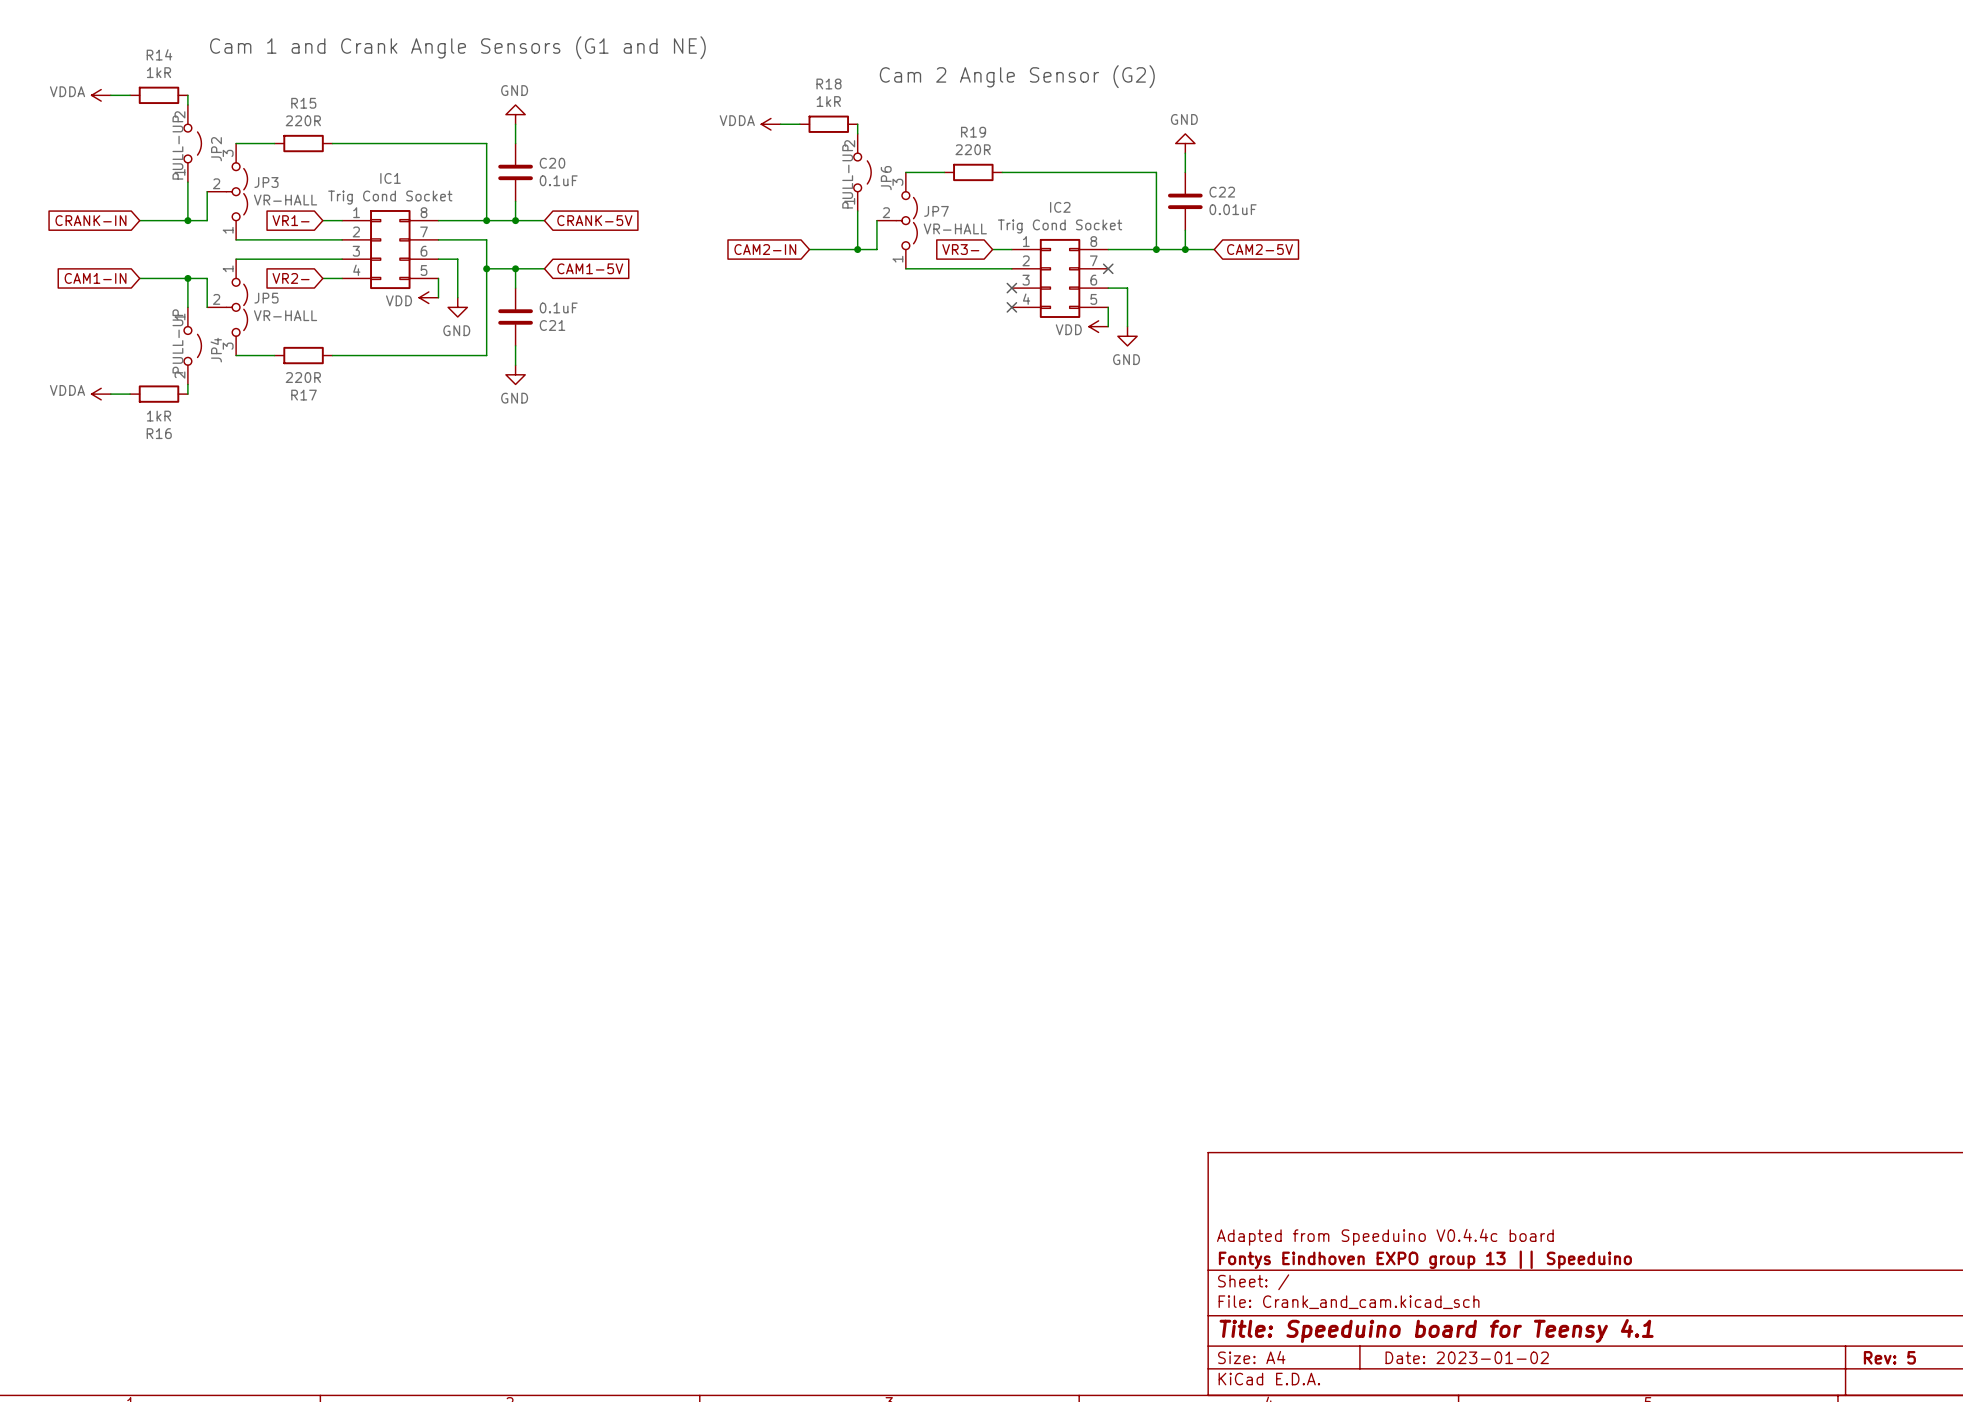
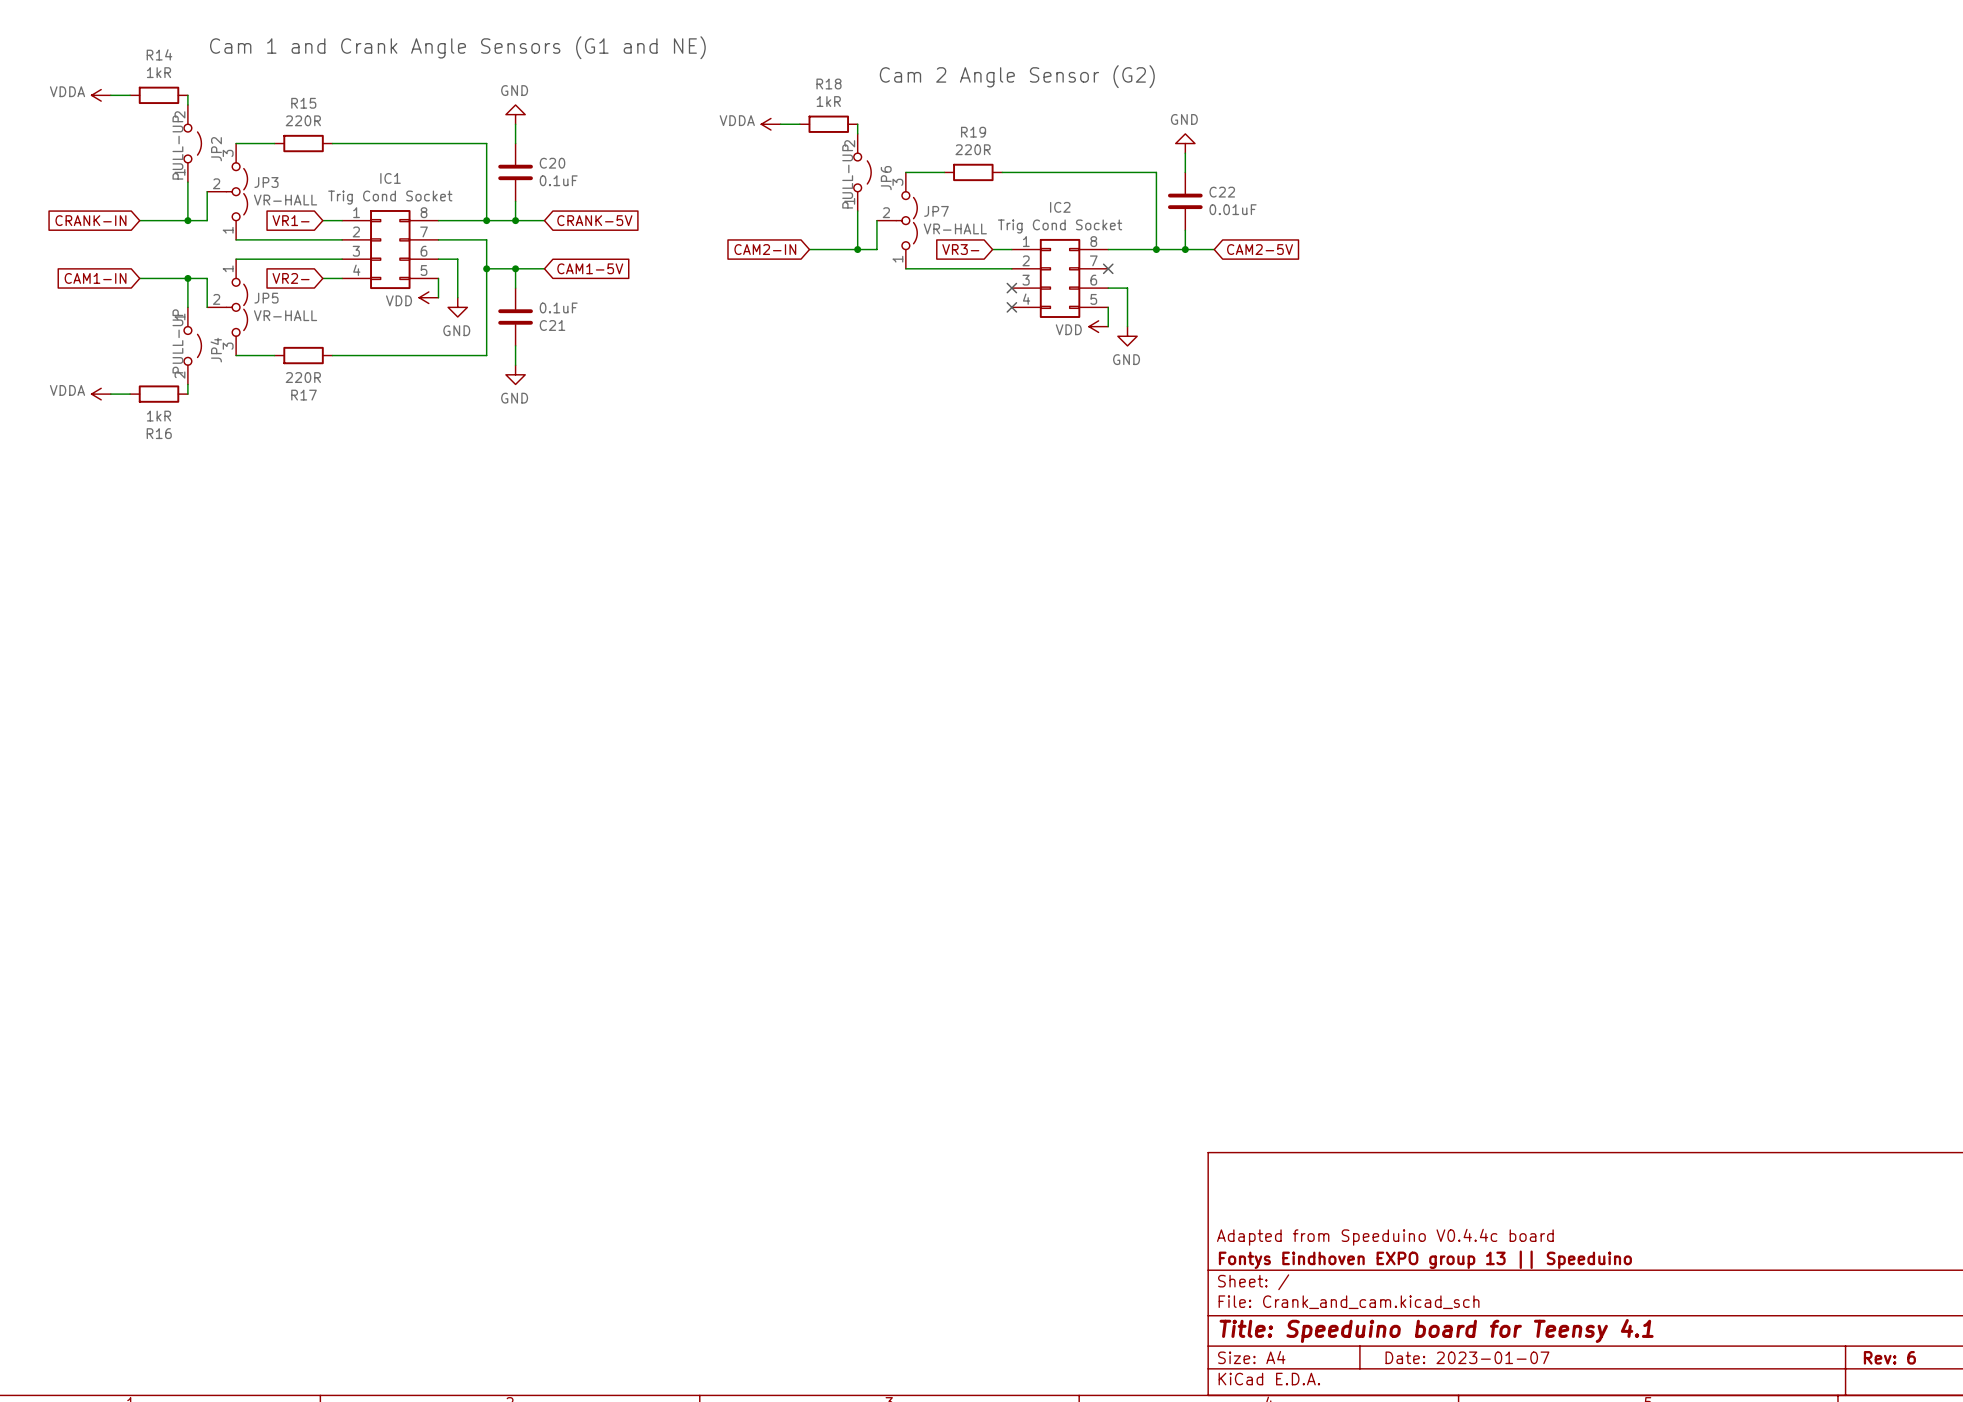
title block: Date: 2023-01-02 (1467, 1357) -> Date: 2023-01-07 (1467, 1357)
title block: Rev: 5 (1889, 1357) -> Rev: 6 (1889, 1357)

